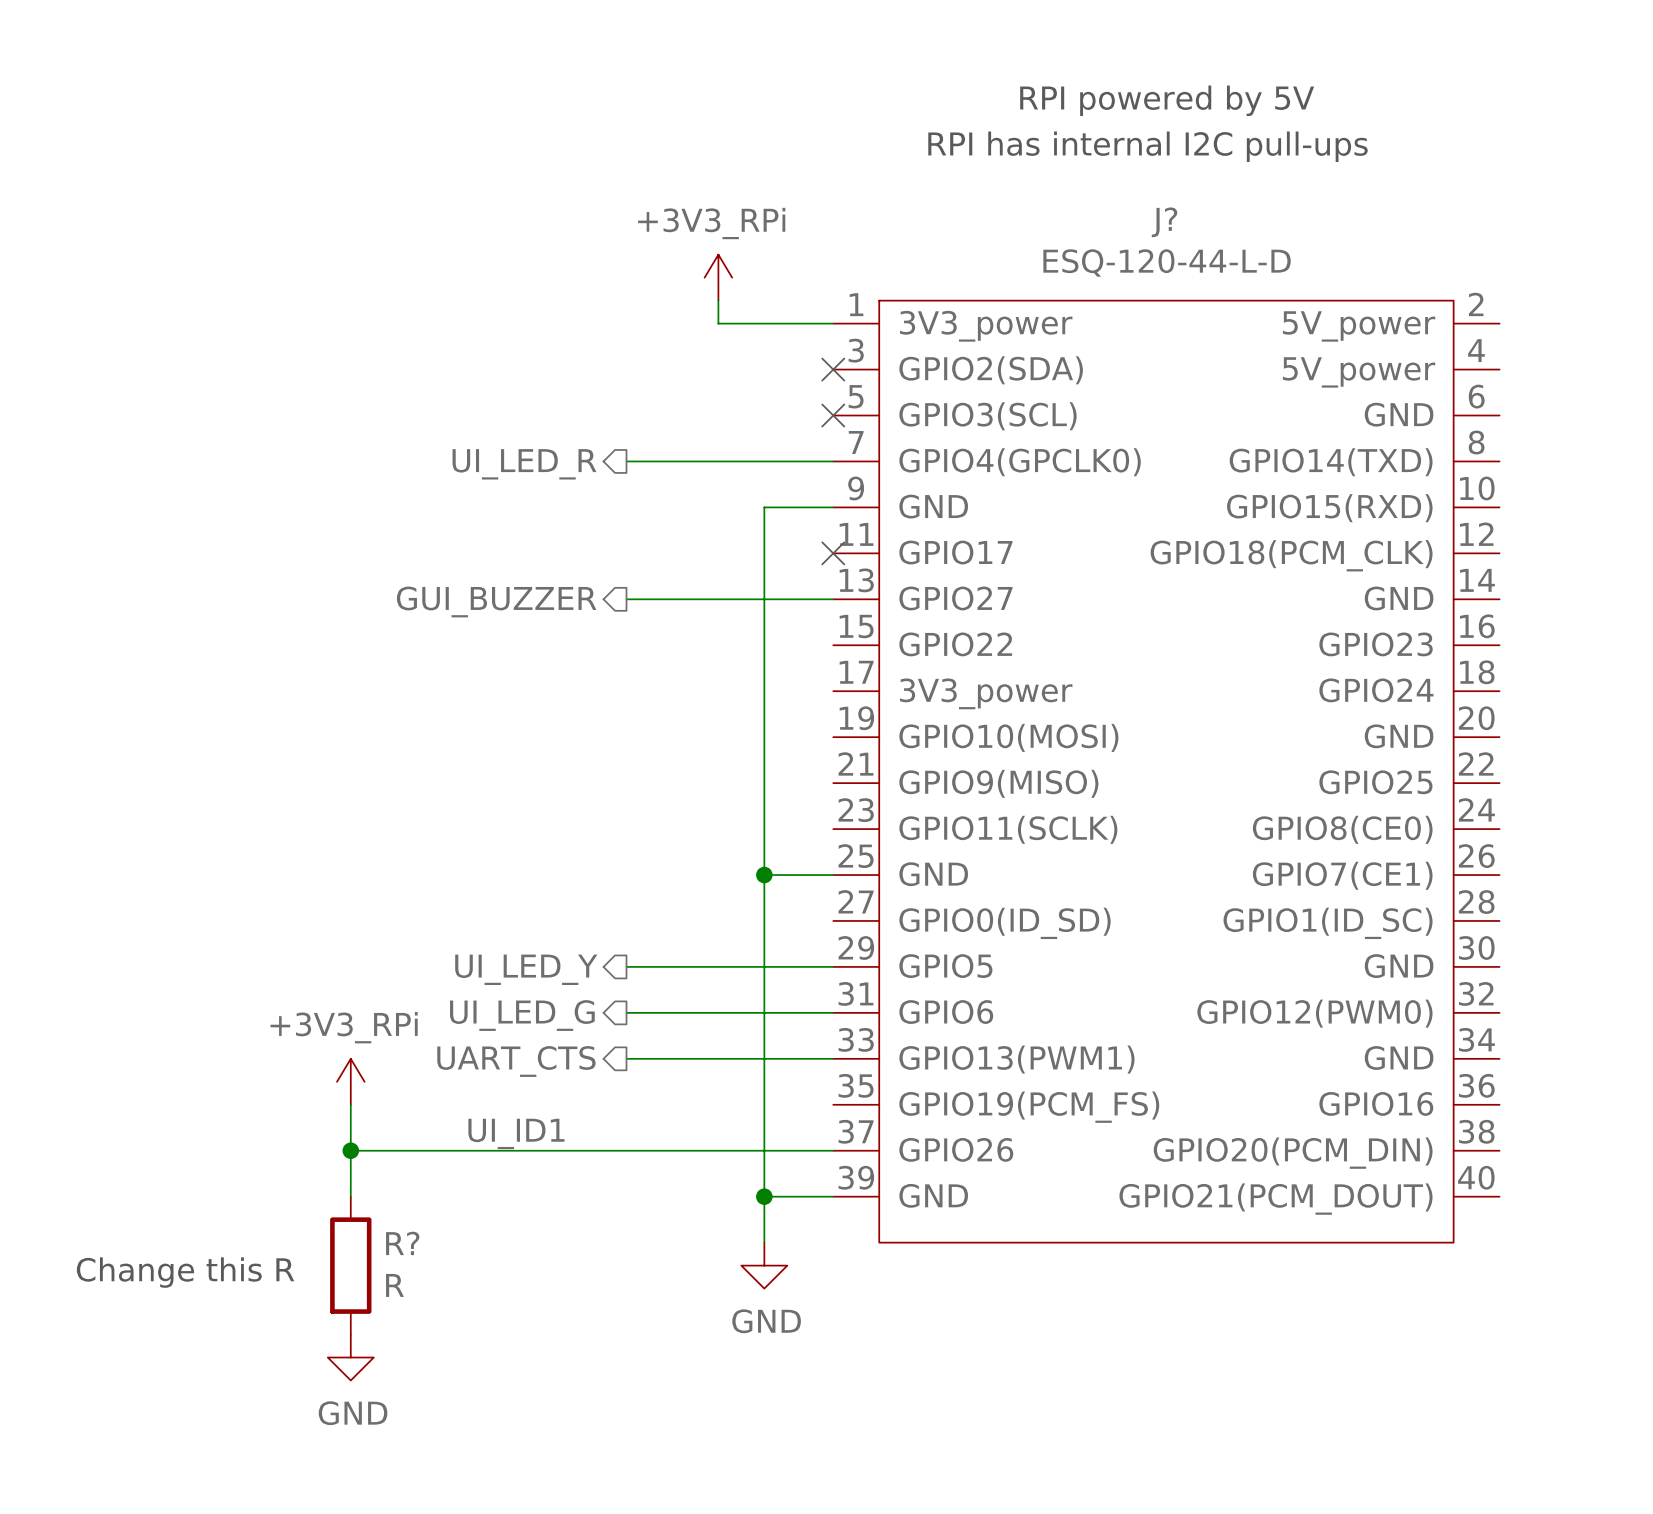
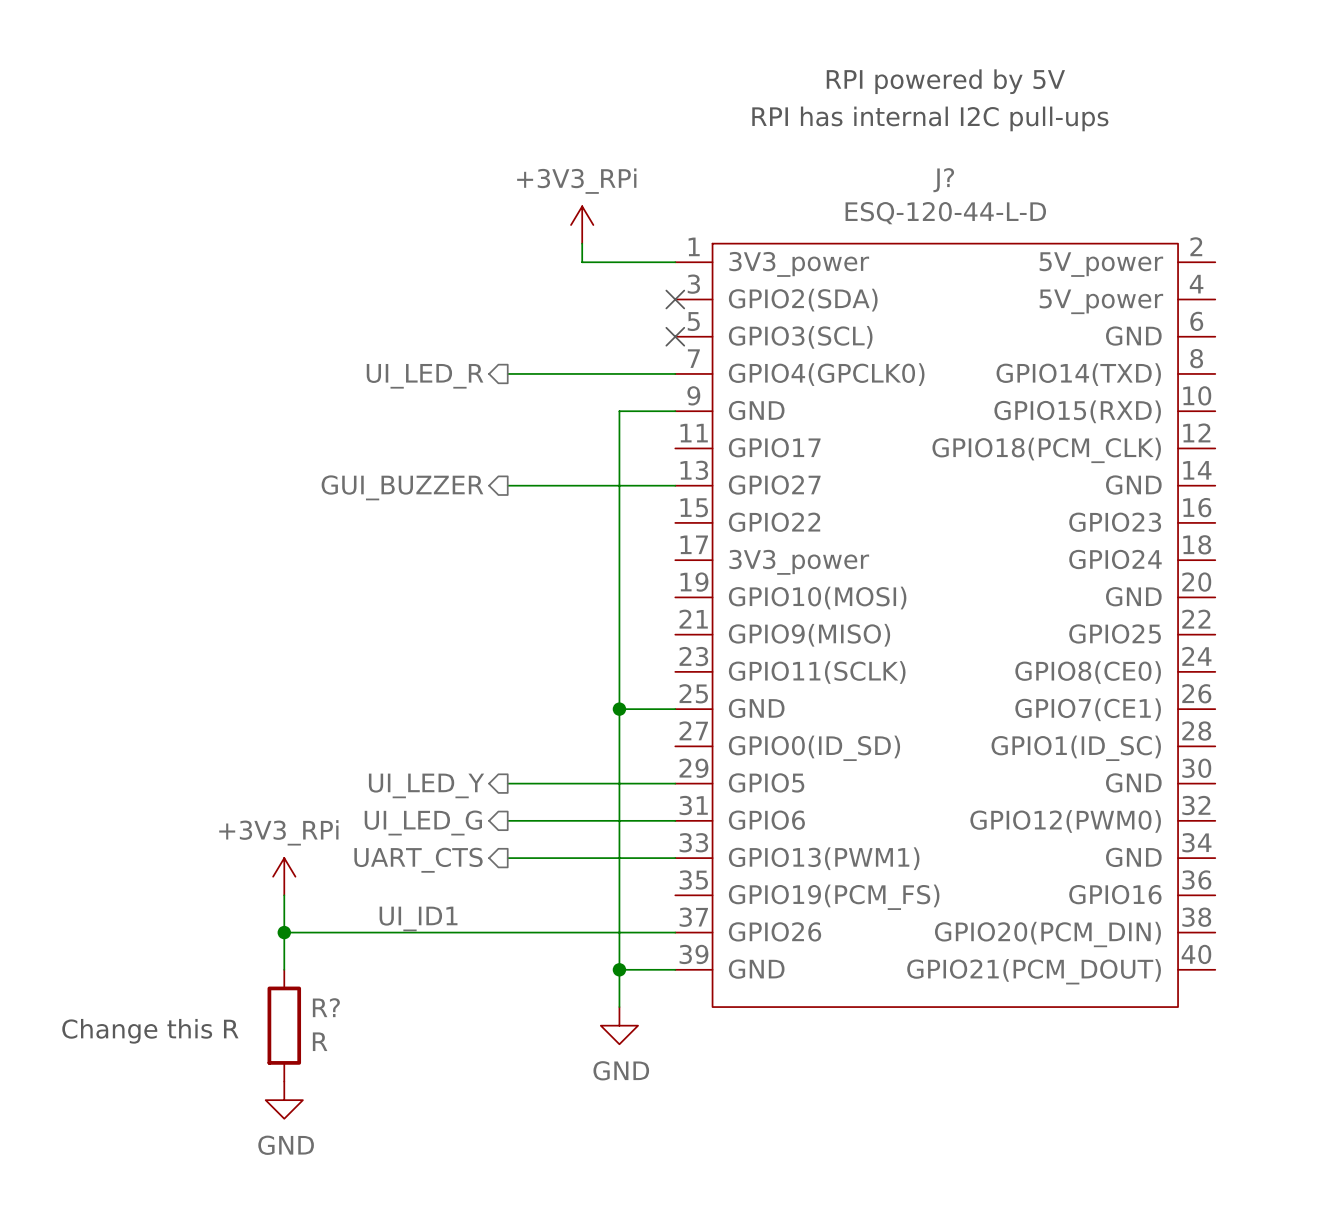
no-connect mark: (833, 553) -> none

